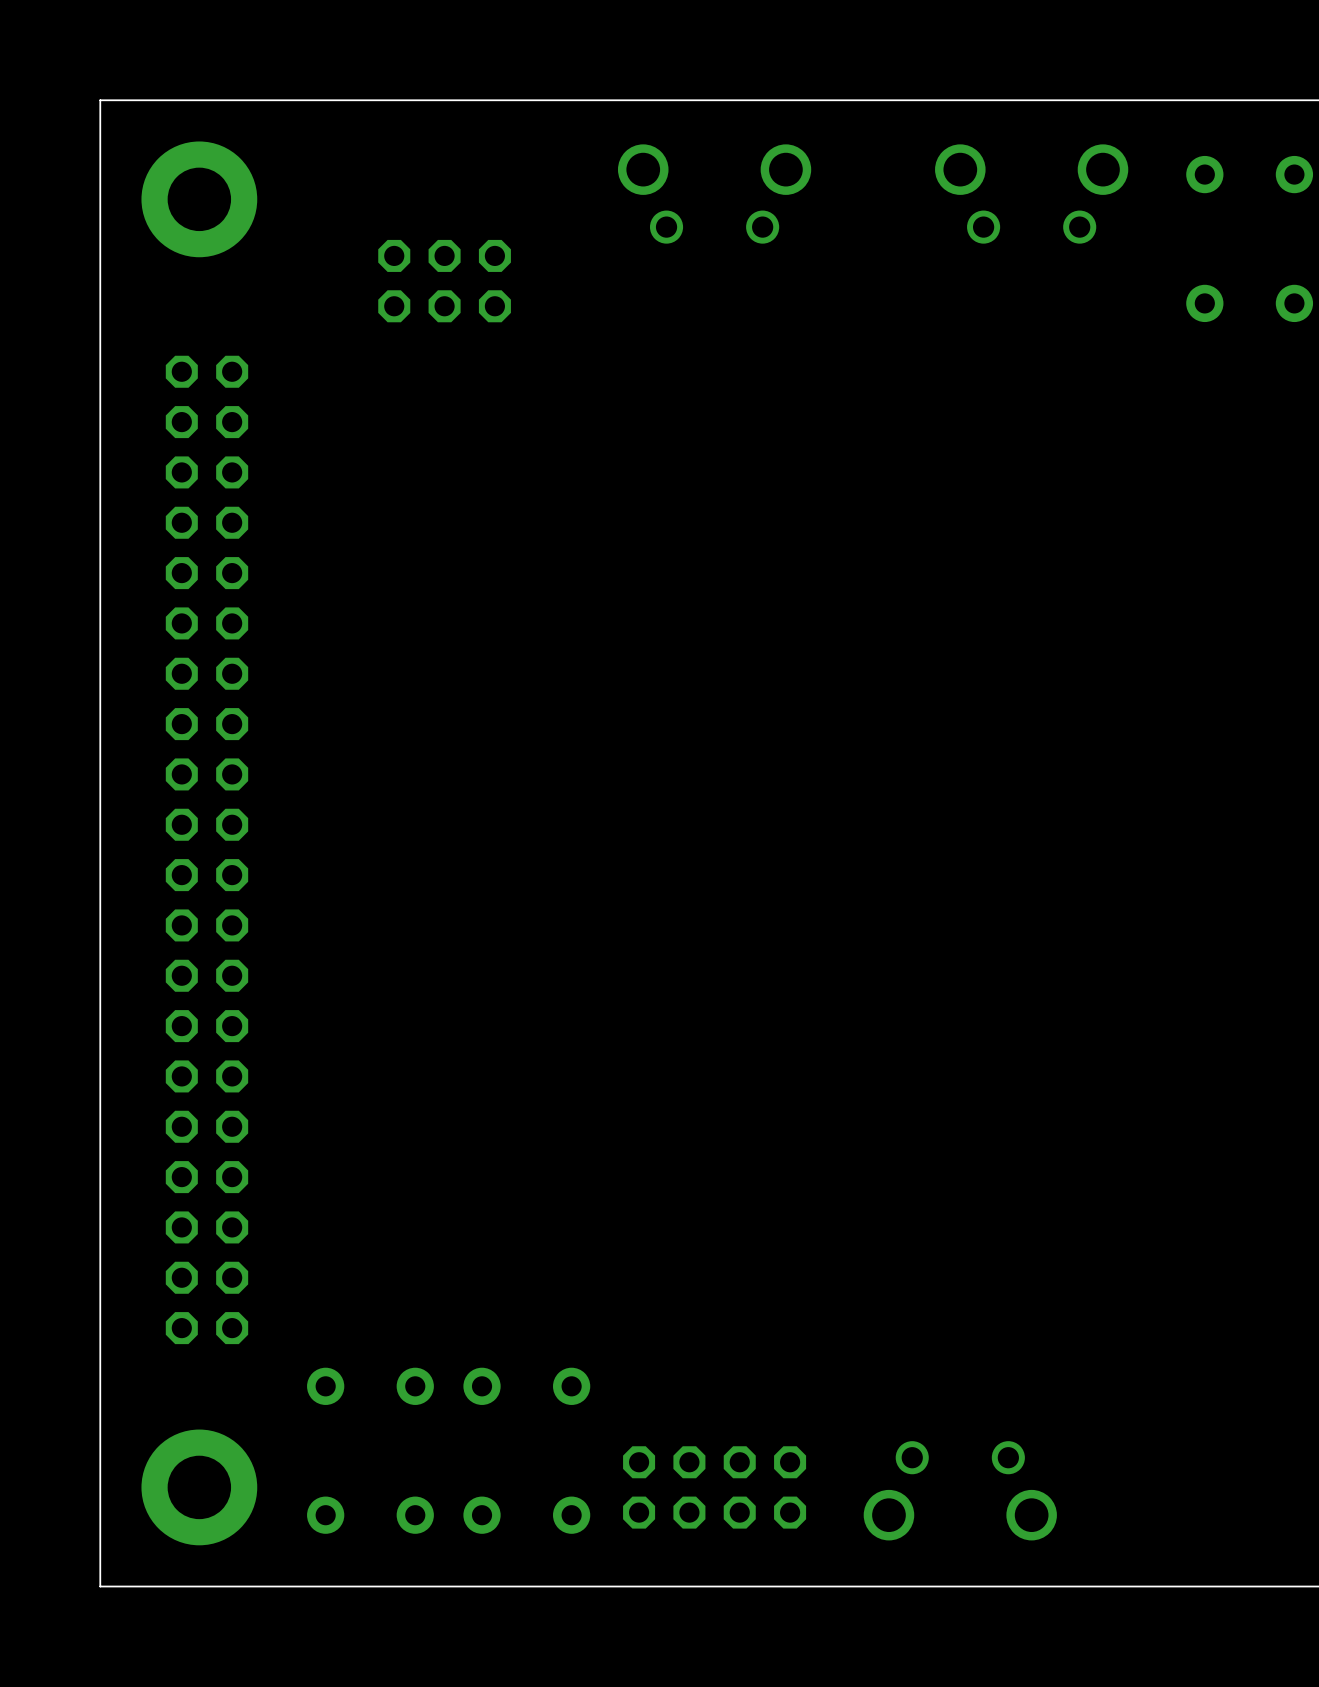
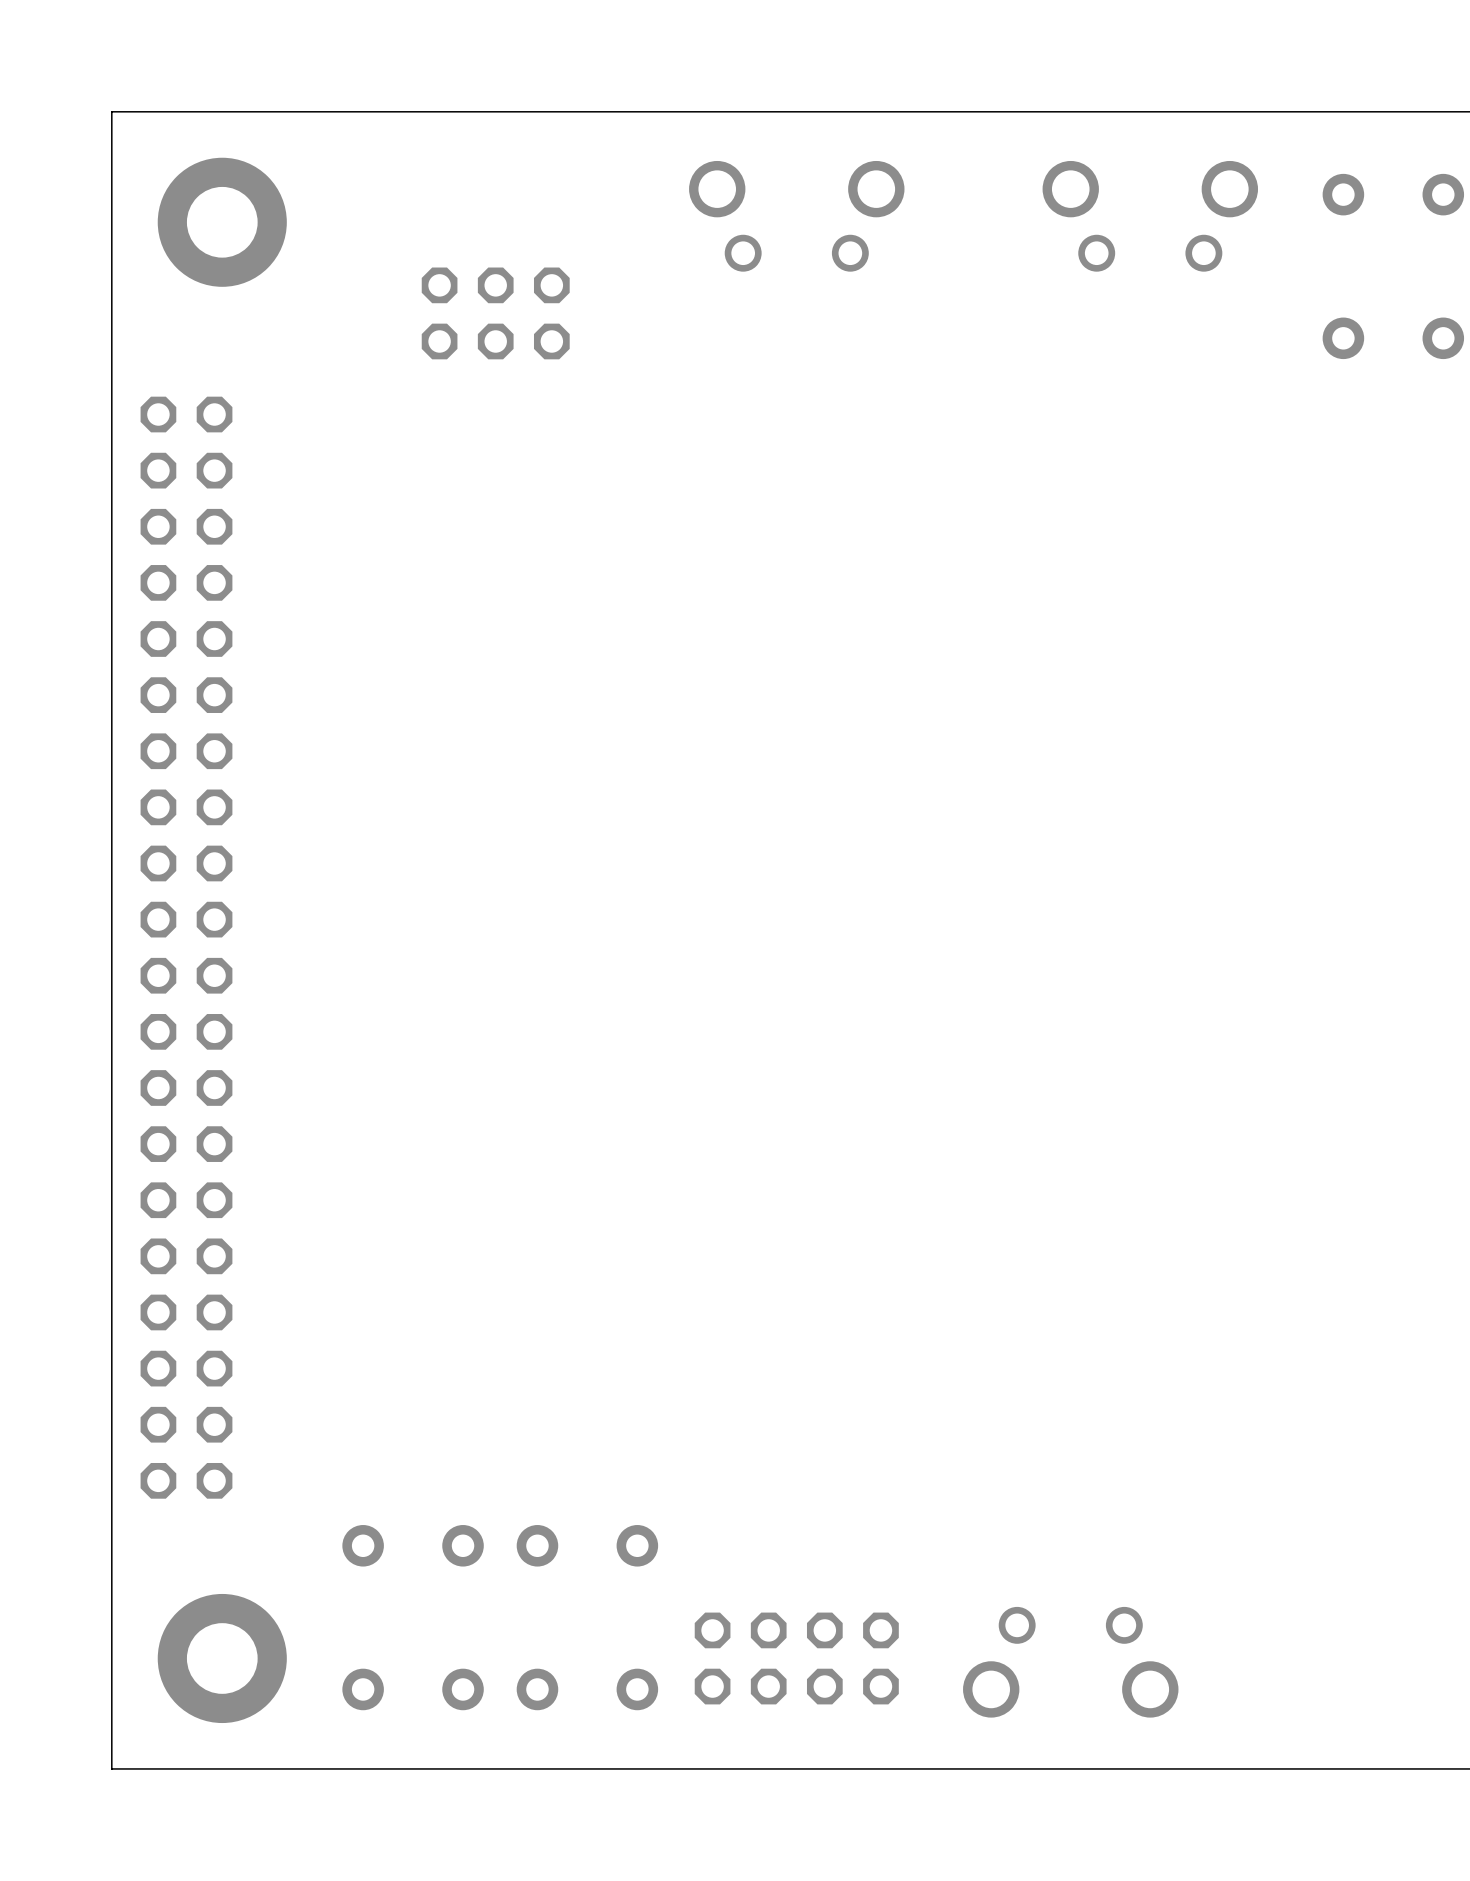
part position: (206, 849) -> (186, 947)

